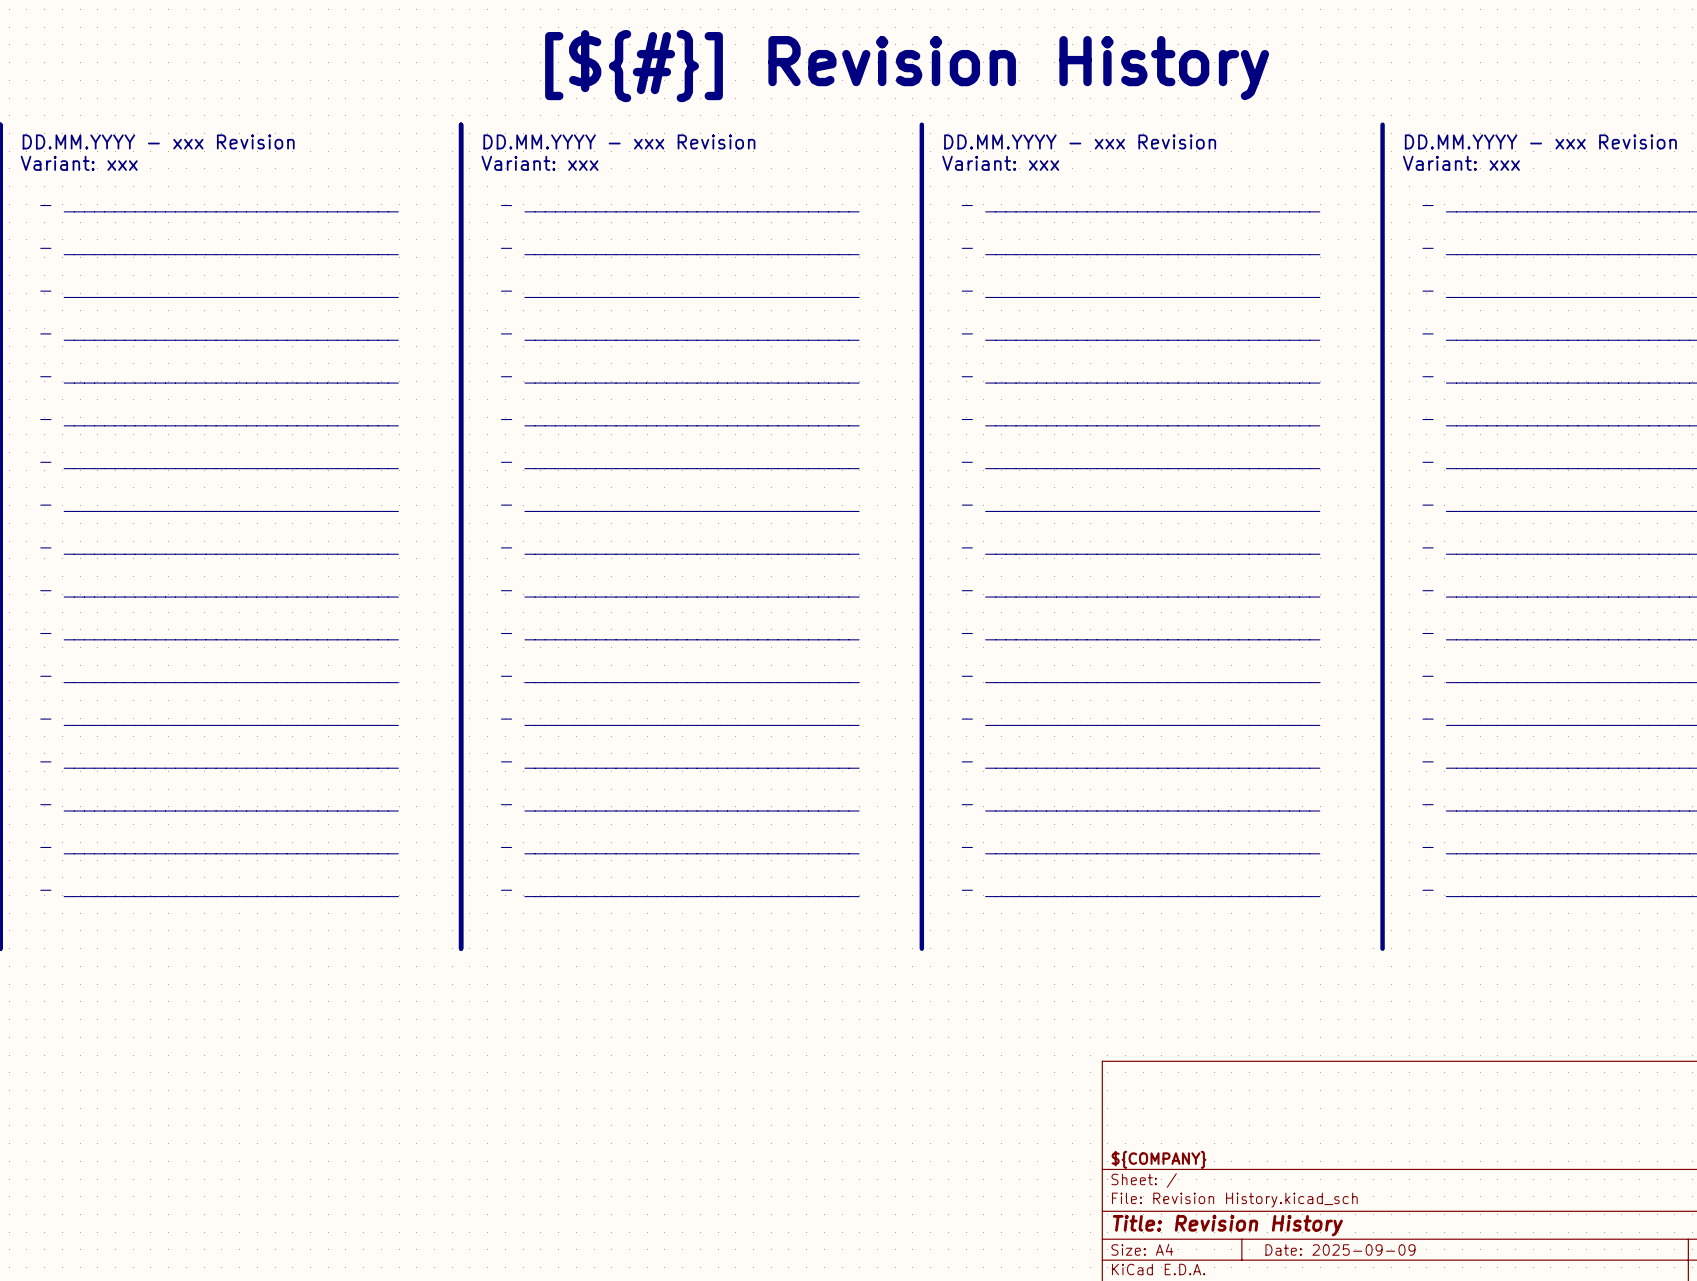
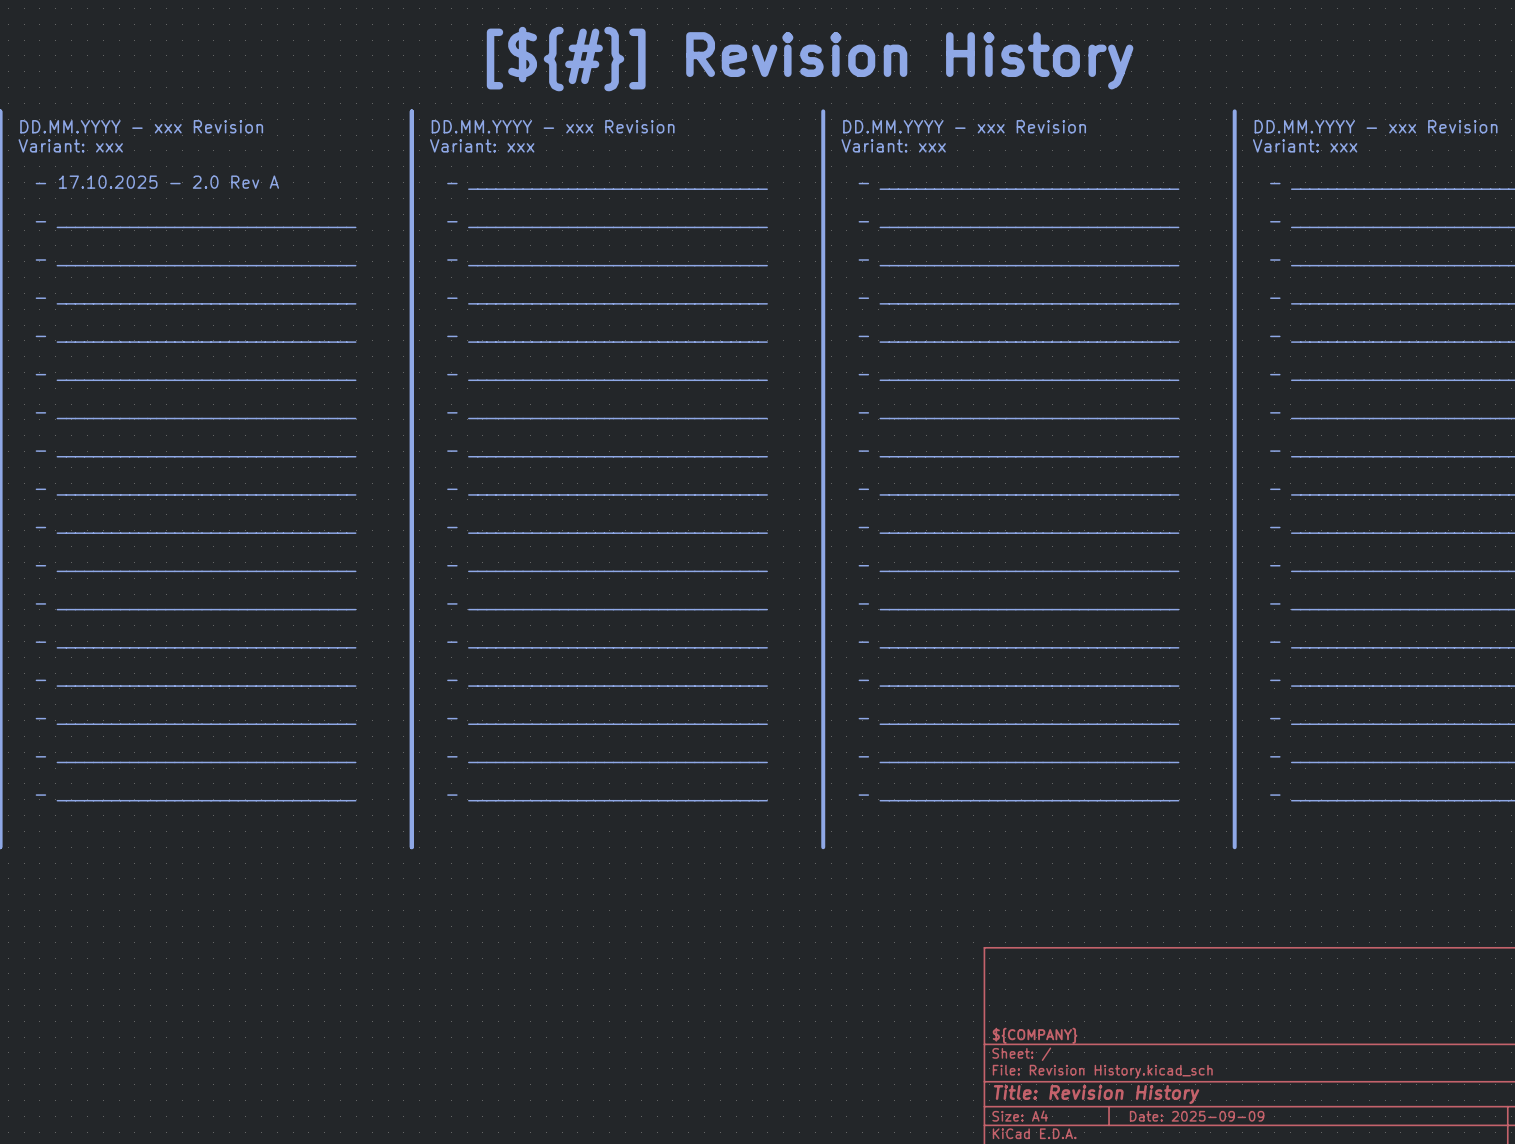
text: - _________________________________ (219, 208) -> - 17.10.2025 - 2.0 Rev A (157, 182)

